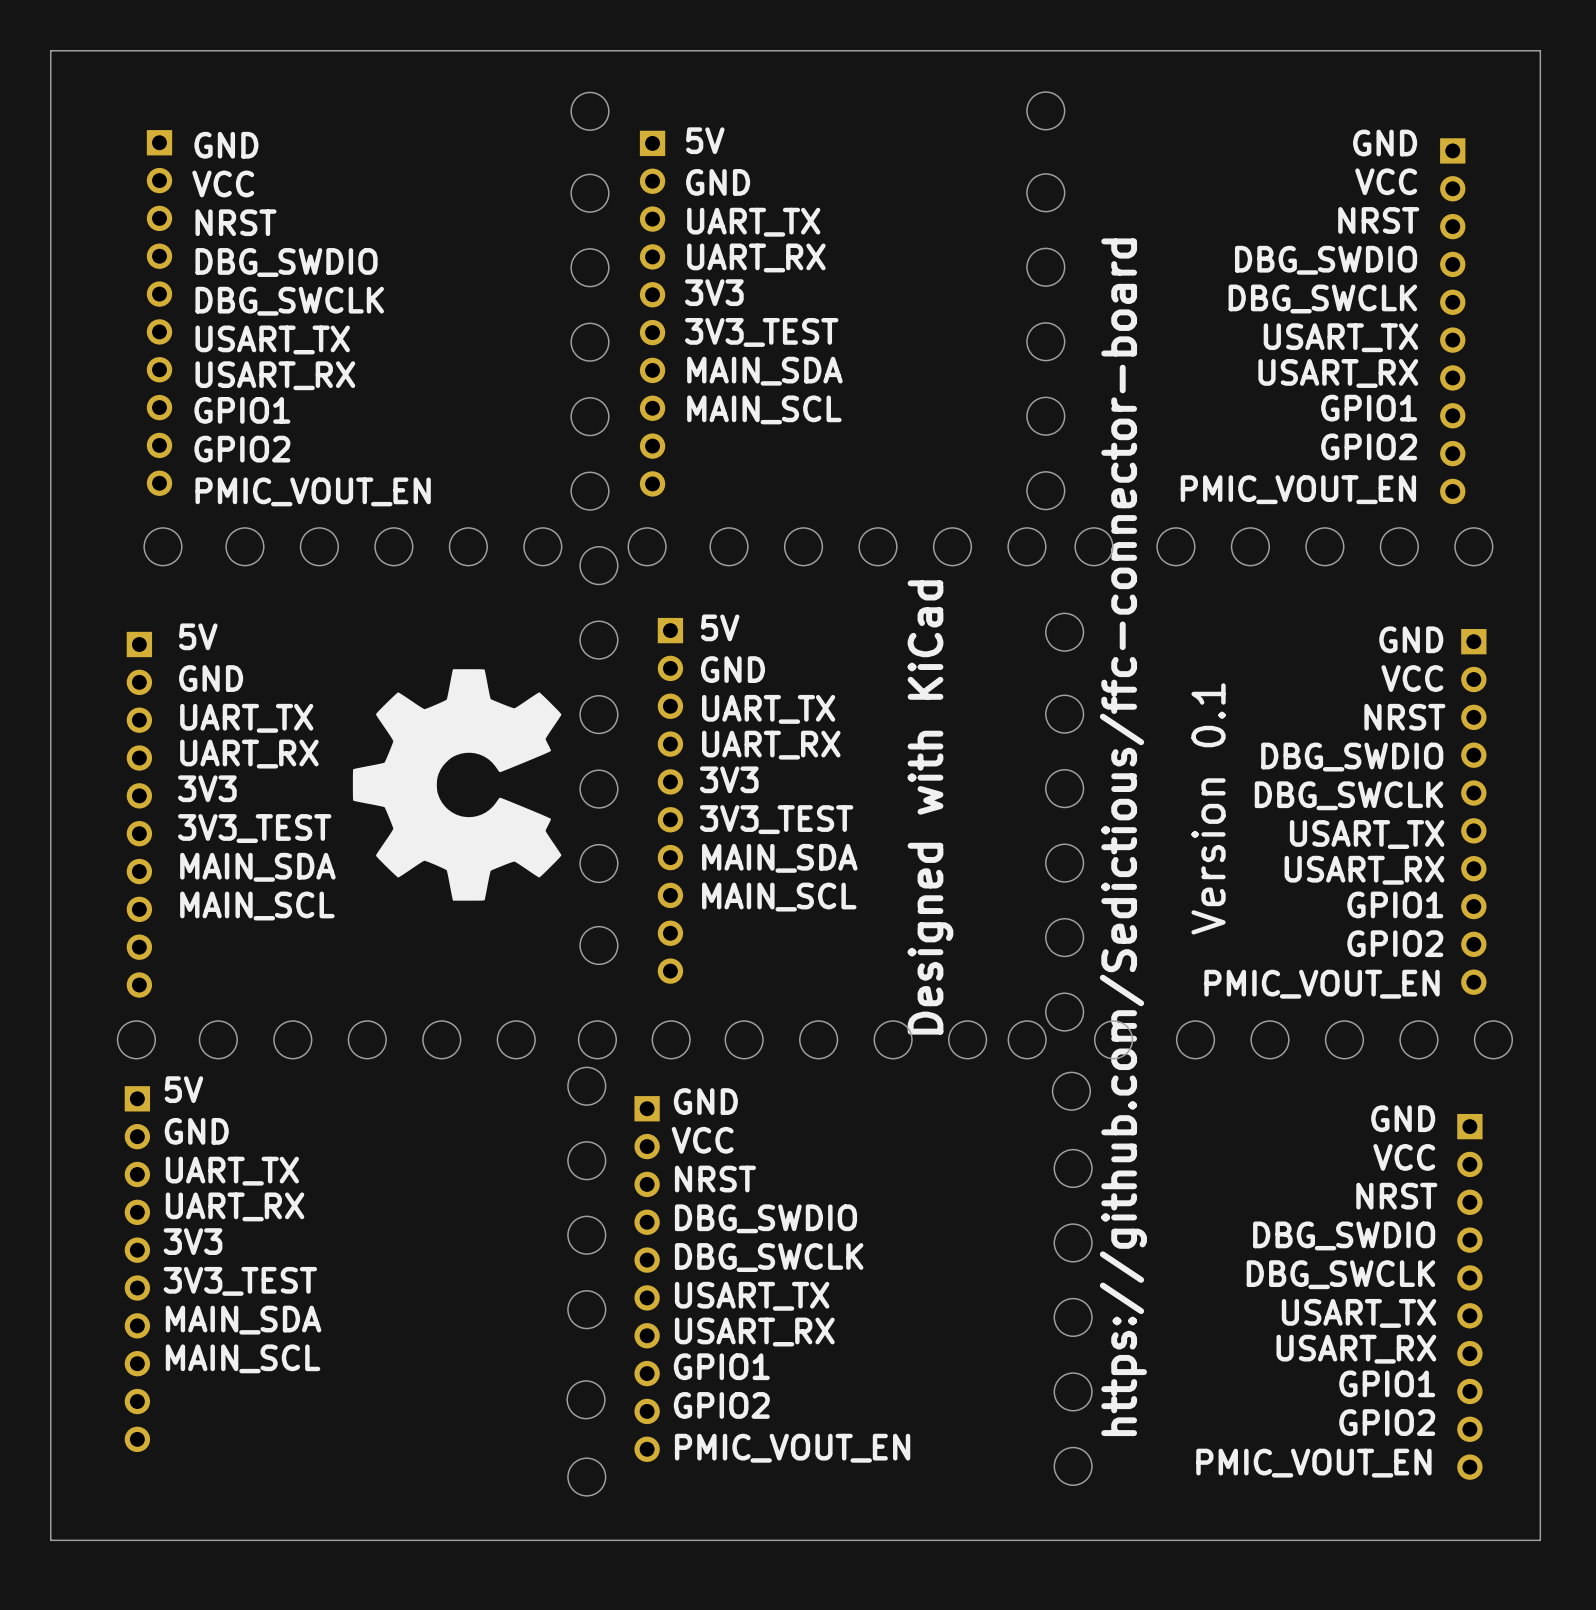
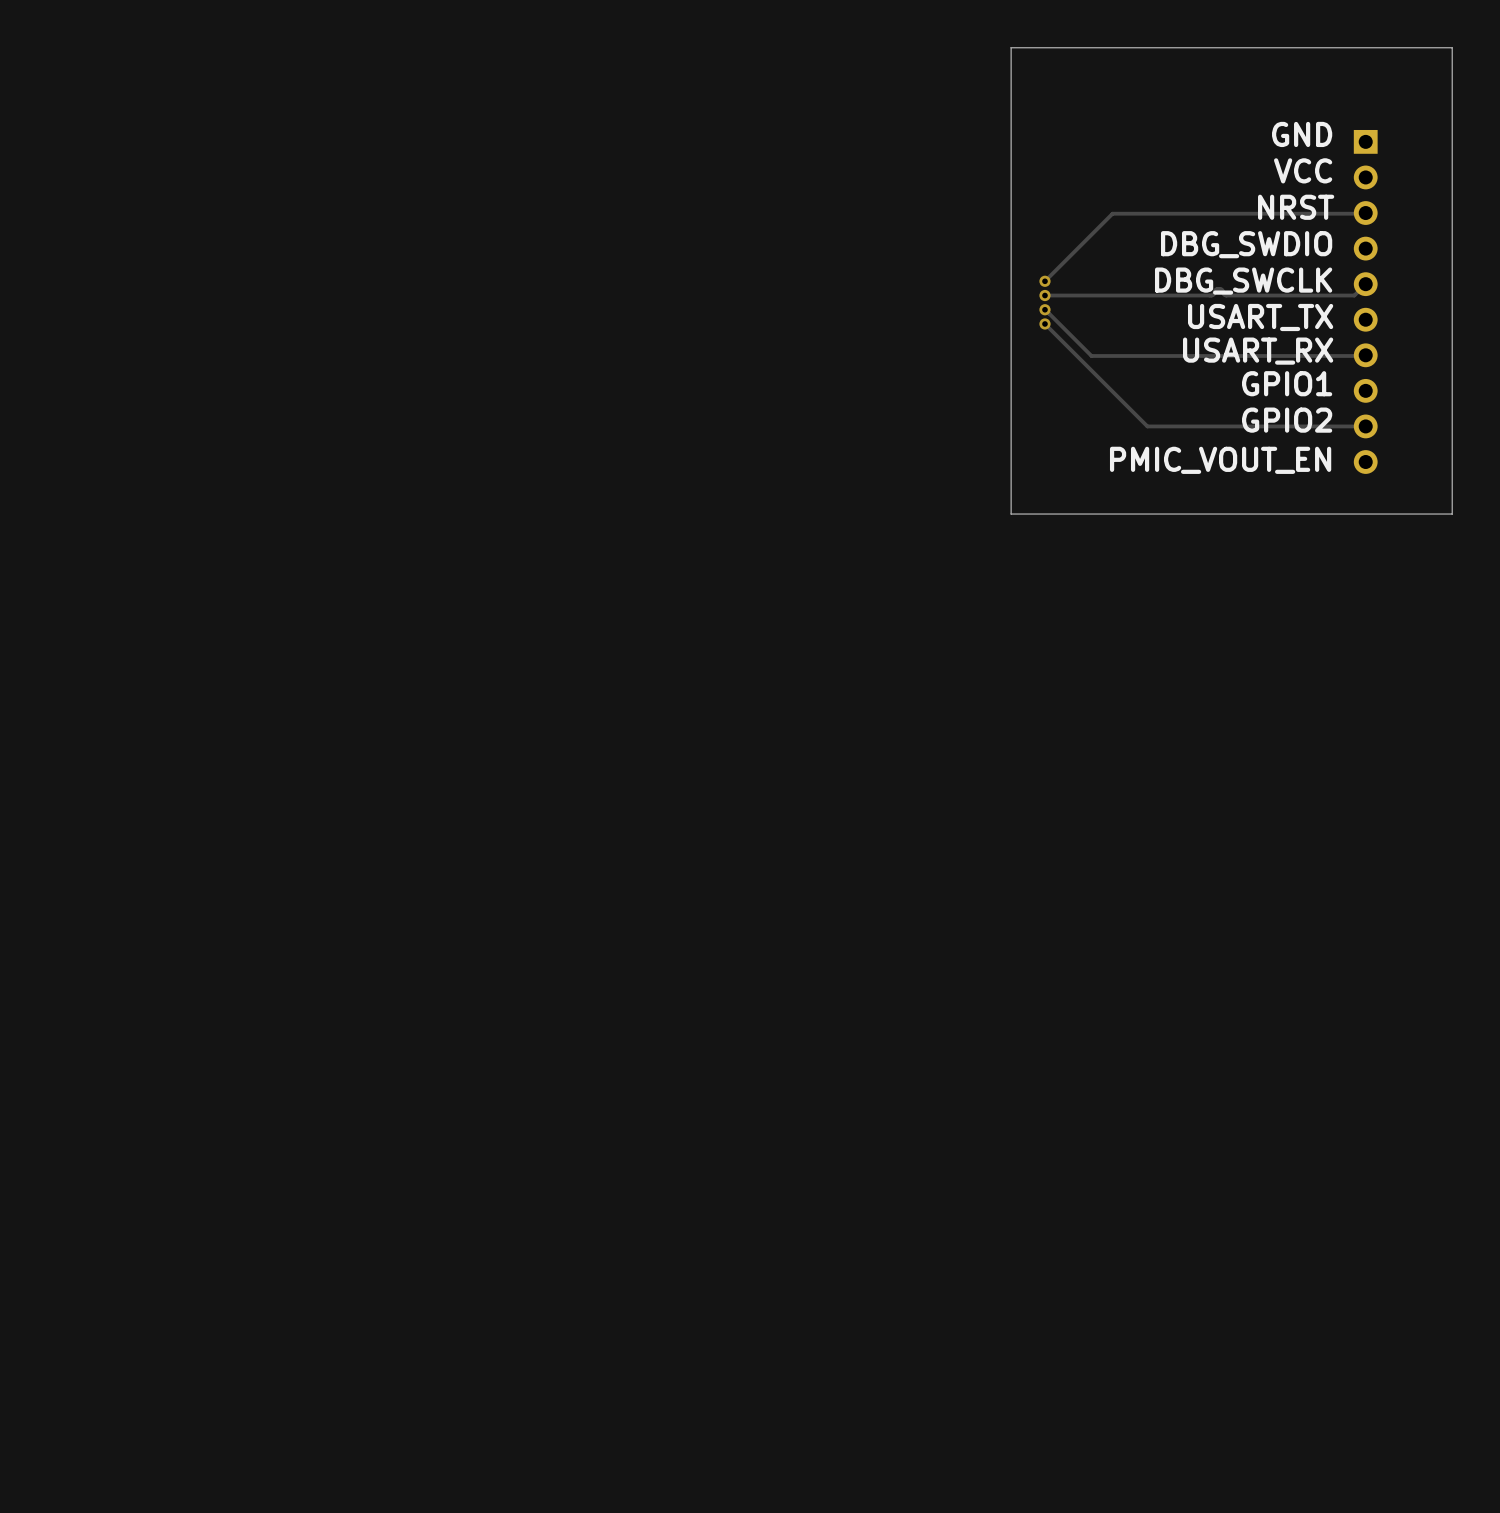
board edge: (1540, 50) (1540, 1540) (50, 1540) (50, 50) (1075, 50) -> (1448, 47) (1452, 47) (1452, 514) (1011, 514) (1011, 47)
round board edge: [570, 91, 610, 131] -> none
round board edge: [1026, 91, 1066, 131] -> none
text: 5V (705, 140) -> none
text: GND (226, 145) -> none
round board edge: [570, 173, 610, 213] -> none
round board edge: [1026, 173, 1066, 213] -> none
text: GND (718, 182) -> none
text: VCC (223, 183) -> none
text: NRST (235, 222) -> none
text: UART_TX (753, 222) -> none
track: none -> (1365, 213) (1112, 213) (1044, 281)
round board edge: [1026, 247, 1066, 287] -> none
round board edge: [570, 248, 610, 288] -> none
text: UART_RX (756, 257) -> none
text: DBG_SWDIO (286, 262) -> none
text: 3V3 (714, 292) -> none
via: none -> (1044, 281)
text: DBG_SWCLK (289, 301) -> none
track: none -> (1365, 284) (1354, 295) (1226, 295) (1219, 288) (1215, 289) (1211, 295) (1044, 295)
part: (159, 312) -> none
part: (652, 313) -> none
via: none -> (1044, 295)
round board edge: [570, 322, 610, 362] -> none
round board edge: [1026, 322, 1066, 362] -> none
track: none -> (1044, 309) (1091, 355) (1365, 355)
via: none -> (1044, 309)
text: 3V3_TEST (761, 332) -> none
text: USART_TX (272, 339) -> none
track: none -> (1044, 323) (1147, 426) (1365, 426)
via: none -> (1044, 323)
text: MAIN_SDA (764, 371) -> none
text: USART_RX (275, 375) -> none
round board edge: [1026, 396, 1066, 436] -> none
round board edge: [570, 397, 610, 437] -> none
text: MAIN_SCL (764, 409) -> none
text: GPIO1 (242, 410) -> none
text: GPIO2 (242, 449) -> none
round board edge: [570, 471, 610, 511] -> none
round board edge: [1026, 471, 1066, 511] -> none
text: PMIC_VOUT_EN (313, 491) -> none
round board edge: [143, 527, 183, 567] -> none
round board edge: [225, 527, 265, 567] -> none
round board edge: [299, 527, 339, 567] -> none
round board edge: [374, 527, 414, 567] -> none
round board edge: [448, 527, 488, 567] -> none
round board edge: [523, 527, 563, 567] -> none
round board edge: [627, 527, 667, 567] -> none
round board edge: [709, 527, 749, 567] -> none
round board edge: [783, 527, 824, 567] -> none
round board edge: [858, 527, 898, 567] -> none
round board edge: [932, 527, 973, 567] -> none
round board edge: [1007, 527, 1047, 567] -> none
round board edge: [1074, 527, 1114, 567] -> none
round board edge: [1156, 527, 1196, 567] -> none
round board edge: [1230, 527, 1270, 567] -> none
round board edge: [1305, 527, 1345, 567] -> none
round board edge: [1379, 527, 1419, 567] -> none
round board edge: [1454, 527, 1494, 567] -> none
round board edge: [579, 546, 619, 586] -> none
round board edge: [1045, 612, 1085, 652] -> none
round board edge: [579, 620, 619, 660] -> none
text: 5V (720, 627) -> none
text: 5V (198, 636) -> none
text: GND (1411, 639) -> none
drawing: [352, 669, 562, 901] -> none
text: GND (732, 669) -> none
text: GND (211, 678) -> none
text: VCC (1412, 678) -> none
round board edge: [1045, 694, 1085, 734] -> none
round board edge: [579, 695, 619, 735] -> none
text: UART_TX (768, 709) -> none
text: NRST (1404, 717) -> none
text: UART_TX (246, 718) -> none
text: UART_RX (771, 745) -> none
text: UART_RX (249, 754) -> none
text: DBG_SWDIO (1352, 757) -> none
round board edge: [579, 769, 619, 809] -> none
round board edge: [1045, 769, 1085, 809] -> none
text: 3V3 (729, 779) -> none
text: 3V3 (207, 788) -> none
text: DBG_SWCLK (1349, 795) -> none
part: (670, 800) -> none
text: Designed with KiCad (930, 807) -> none
text: Version 0.1 (1208, 808) -> none
part: (1473, 811) -> none
part: (139, 814) -> none
text: 3V3_TEST (776, 819) -> none
text: 3V3_TEST (254, 828) -> none
text: USART_TX (1367, 834) -> none
text: https://github.com/Sedictious/ffc-connector-board (1123, 837) -> none
round board edge: [579, 843, 619, 884] -> none
round board edge: [1045, 843, 1085, 883] -> none
text: MAIN_SDA (779, 858) -> none
text: MAIN_SDA (257, 867) -> none
text: USART_RX (1364, 870) -> none
text: MAIN_SCL (779, 897) -> none
text: GPIO1 (1395, 904) -> none
text: MAIN_SCL (257, 906) -> none
round board edge: [1045, 918, 1085, 958] -> none
round board edge: [579, 925, 619, 966] -> none
text: GPIO2 (1395, 943) -> none
text: PMIC_VOUT_EN (1322, 984) -> none
round board edge: [1045, 992, 1085, 1032] -> none
round board edge: [116, 1020, 156, 1060] -> none
round board edge: [198, 1020, 238, 1060] -> none
round board edge: [273, 1020, 313, 1060] -> none
round board edge: [347, 1020, 387, 1060] -> none
round board edge: [422, 1020, 462, 1060] -> none
round board edge: [496, 1020, 536, 1060] -> none
round board edge: [577, 1020, 618, 1060] -> none
round board edge: [651, 1020, 691, 1060] -> none
round board edge: [724, 1020, 764, 1060] -> none
round board edge: [799, 1020, 839, 1060] -> none
round board edge: [873, 1020, 913, 1060] -> none
round board edge: [948, 1020, 988, 1060] -> none
round board edge: [1007, 1020, 1047, 1060] -> none
round board edge: [1093, 1020, 1134, 1060] -> none
round board edge: [1175, 1020, 1216, 1060] -> none
round board edge: [1250, 1020, 1290, 1060] -> none
round board edge: [1324, 1020, 1365, 1060] -> none
round board edge: [1399, 1020, 1439, 1060] -> none
round board edge: [1473, 1020, 1514, 1060] -> none
round board edge: [567, 1066, 607, 1106] -> none
round board edge: [1051, 1071, 1092, 1111] -> none
text: 5V (183, 1089) -> none
text: GND (705, 1101) -> none
text: GND (1403, 1118) -> none
text: GND (196, 1131) -> none
text: VCC (702, 1140) -> none
round board edge: [567, 1141, 607, 1181] -> none
round board edge: [1053, 1148, 1093, 1189] -> none
text: VCC (1404, 1157) -> none
text: UART_TX (232, 1171) -> none
text: NRST (715, 1179) -> none
text: NRST (1396, 1196) -> none
text: UART_RX (235, 1206) -> none
round board edge: [567, 1215, 607, 1255] -> none
text: DBG_SWDIO (765, 1218) -> none
round board edge: [1053, 1223, 1093, 1263] -> none
text: DBG_SWDIO (1344, 1235) -> none
text: 3V3 (193, 1241) -> none
text: DBG_SWCLK (769, 1257) -> none
part: (137, 1269) -> none
text: DBG_SWCLK (1340, 1274) -> none
part: (647, 1279) -> none
text: 3V3_TEST (240, 1281) -> none
round board edge: [567, 1290, 607, 1330] -> none
text: USART_TX (752, 1296) -> none
part: (1469, 1296) -> none
round board edge: [1053, 1297, 1093, 1338] -> none
text: USART_TX (1359, 1313) -> none
text: MAIN_SDA (243, 1320) -> none
text: USART_RX (754, 1332) -> none
text: USART_RX (1356, 1349) -> none
text: MAIN_SCL (243, 1358) -> none
text: GPIO1 (721, 1366) -> none
round board edge: [1053, 1372, 1093, 1412] -> none
round board edge: [566, 1380, 606, 1420] -> none
text: GPIO1 (1387, 1383) -> none
text: GPIO2 (721, 1405) -> none
text: GPIO2 (1387, 1422) -> none
round board edge: [1053, 1446, 1093, 1486] -> none
text: PMIC_VOUT_EN (792, 1448) -> none
round board edge: [567, 1457, 607, 1497] -> none
text: PMIC_VOUT_EN (1313, 1463) -> none

